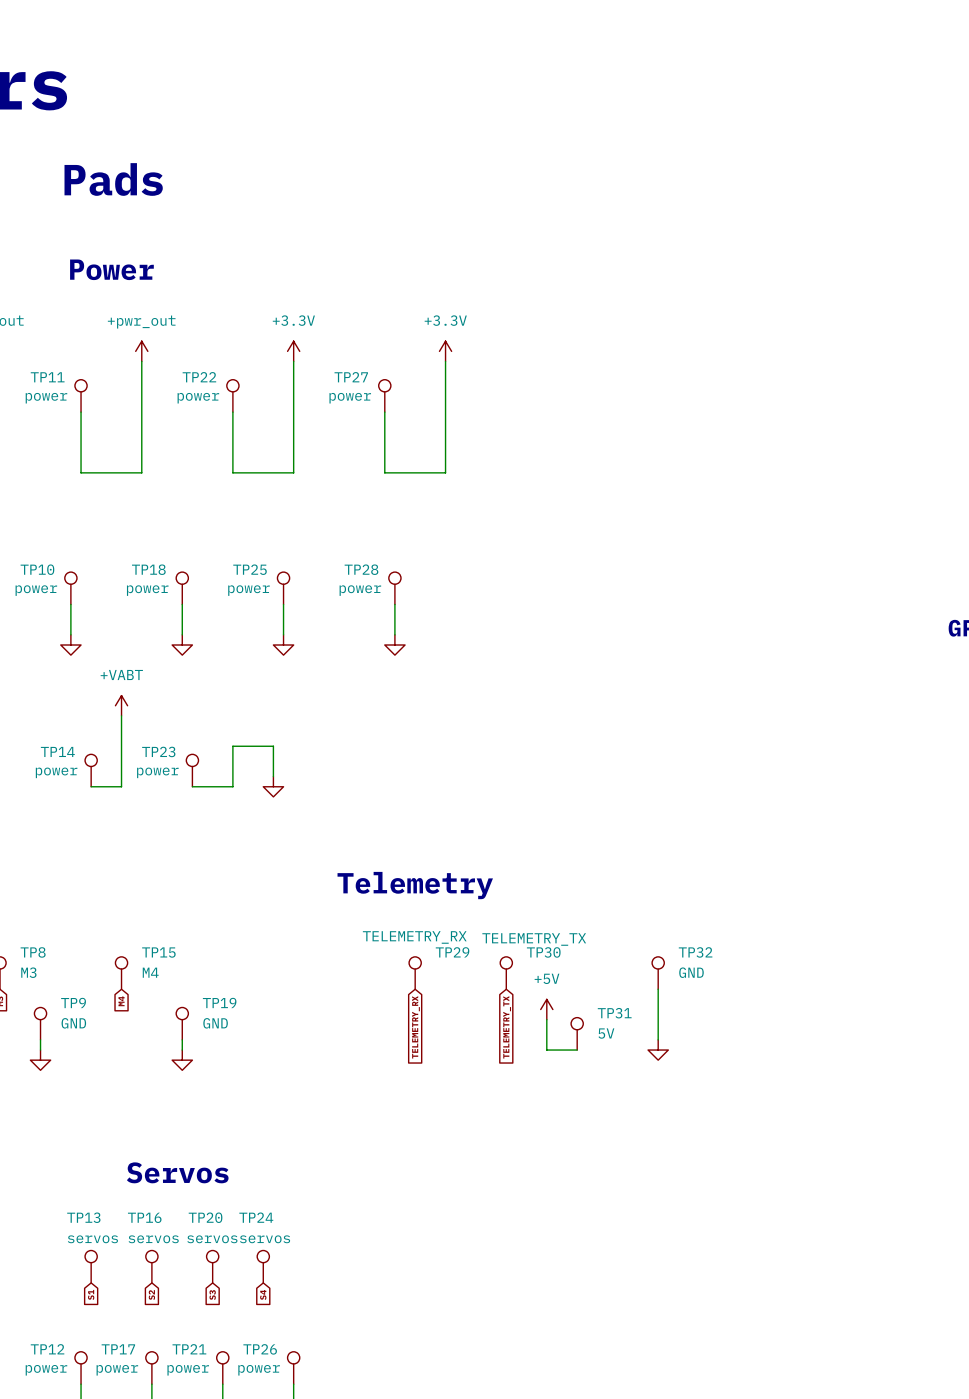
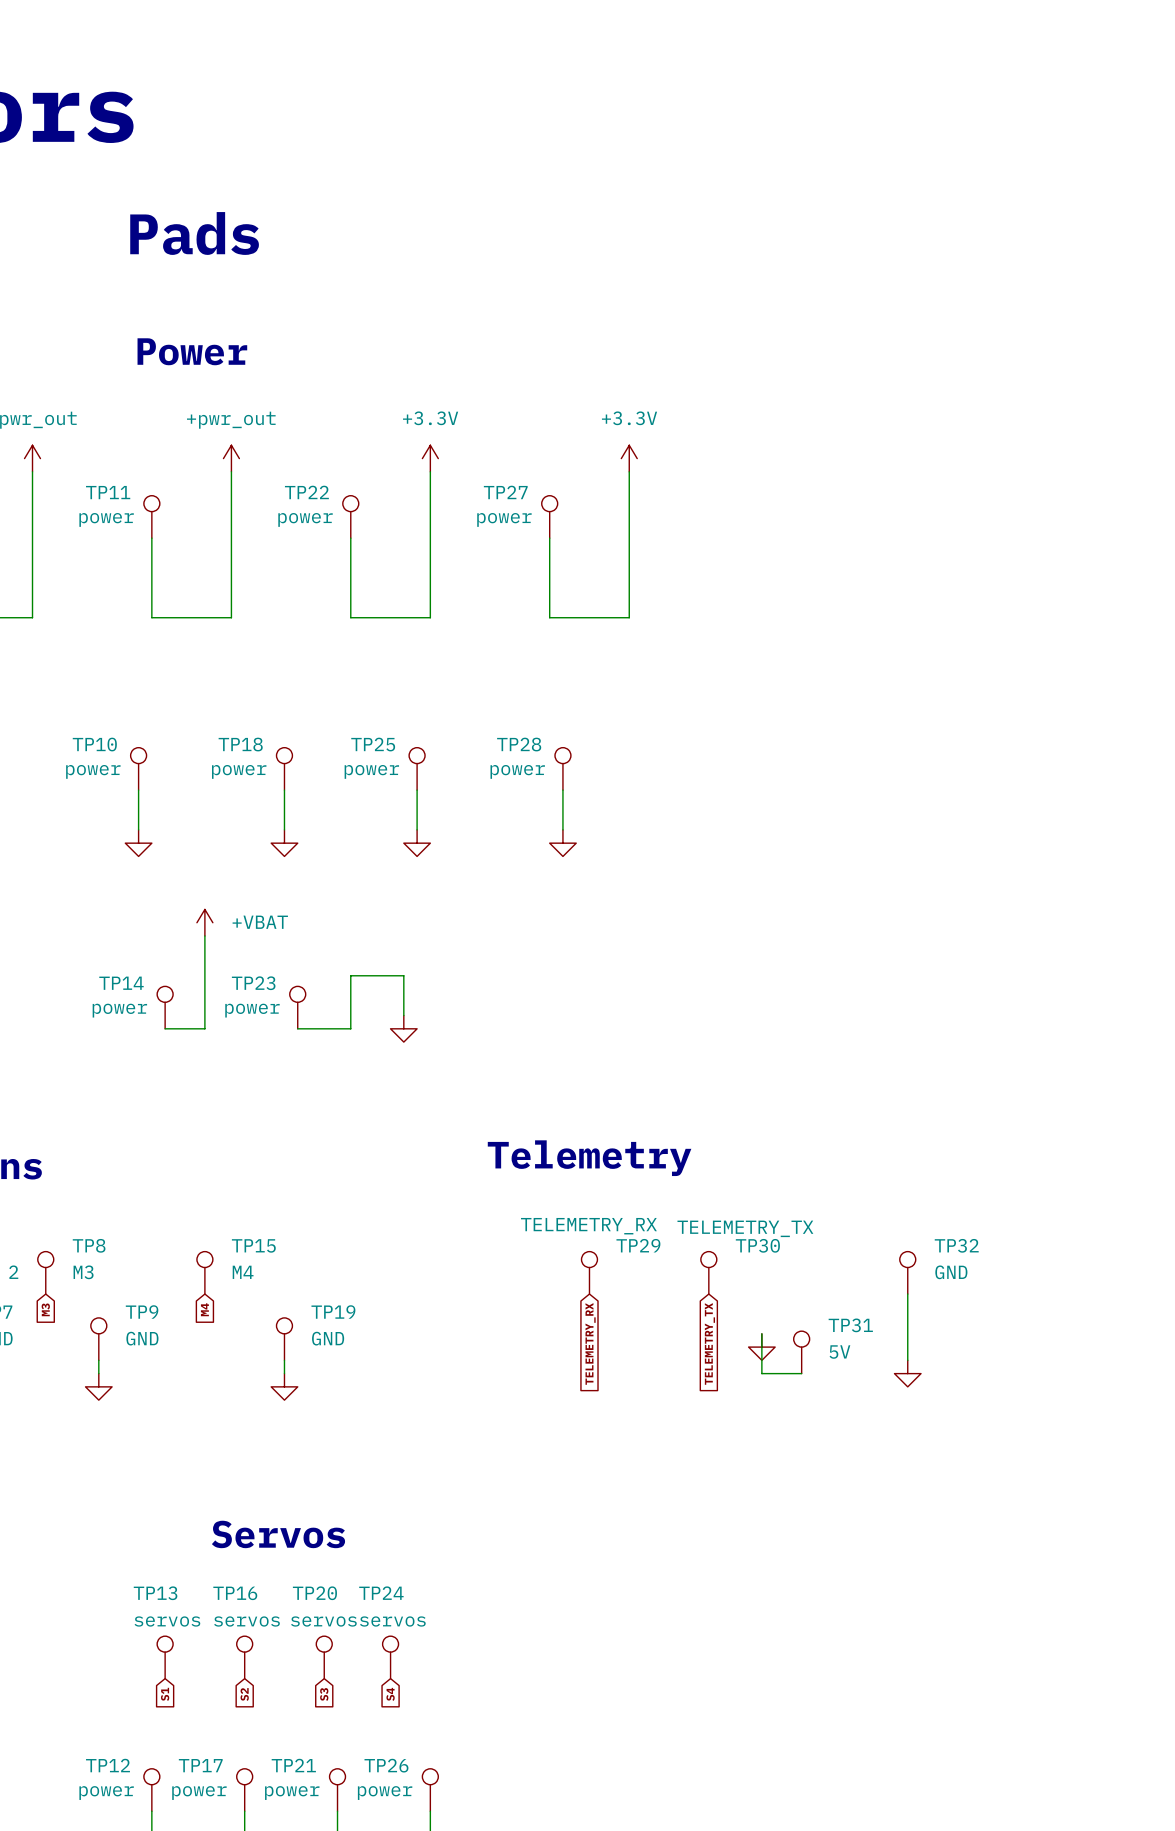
power symbol: +VABT (121, 705) -> +VBAT (204, 922)
power symbol: +5V (546, 1009) -> none
power symbol: none -> (761, 1347)

